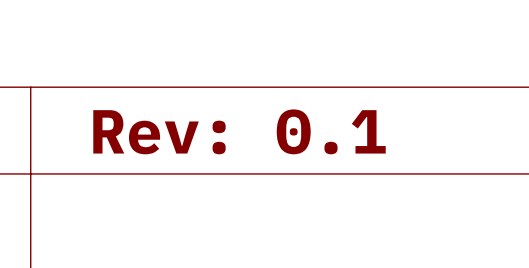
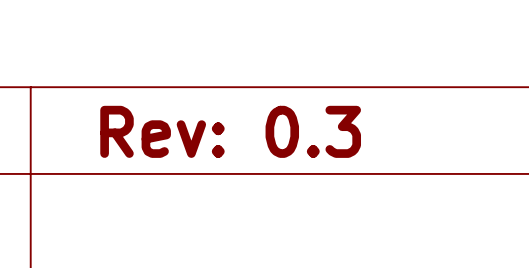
title block: Rev: 0.1 (239, 131) -> Rev: 0.3 (230, 131)

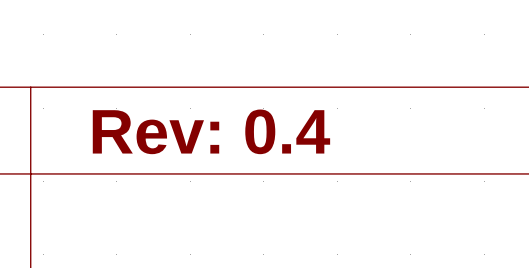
title block: Rev: 0.3 (230, 131) -> Rev: 0.4 (211, 131)

